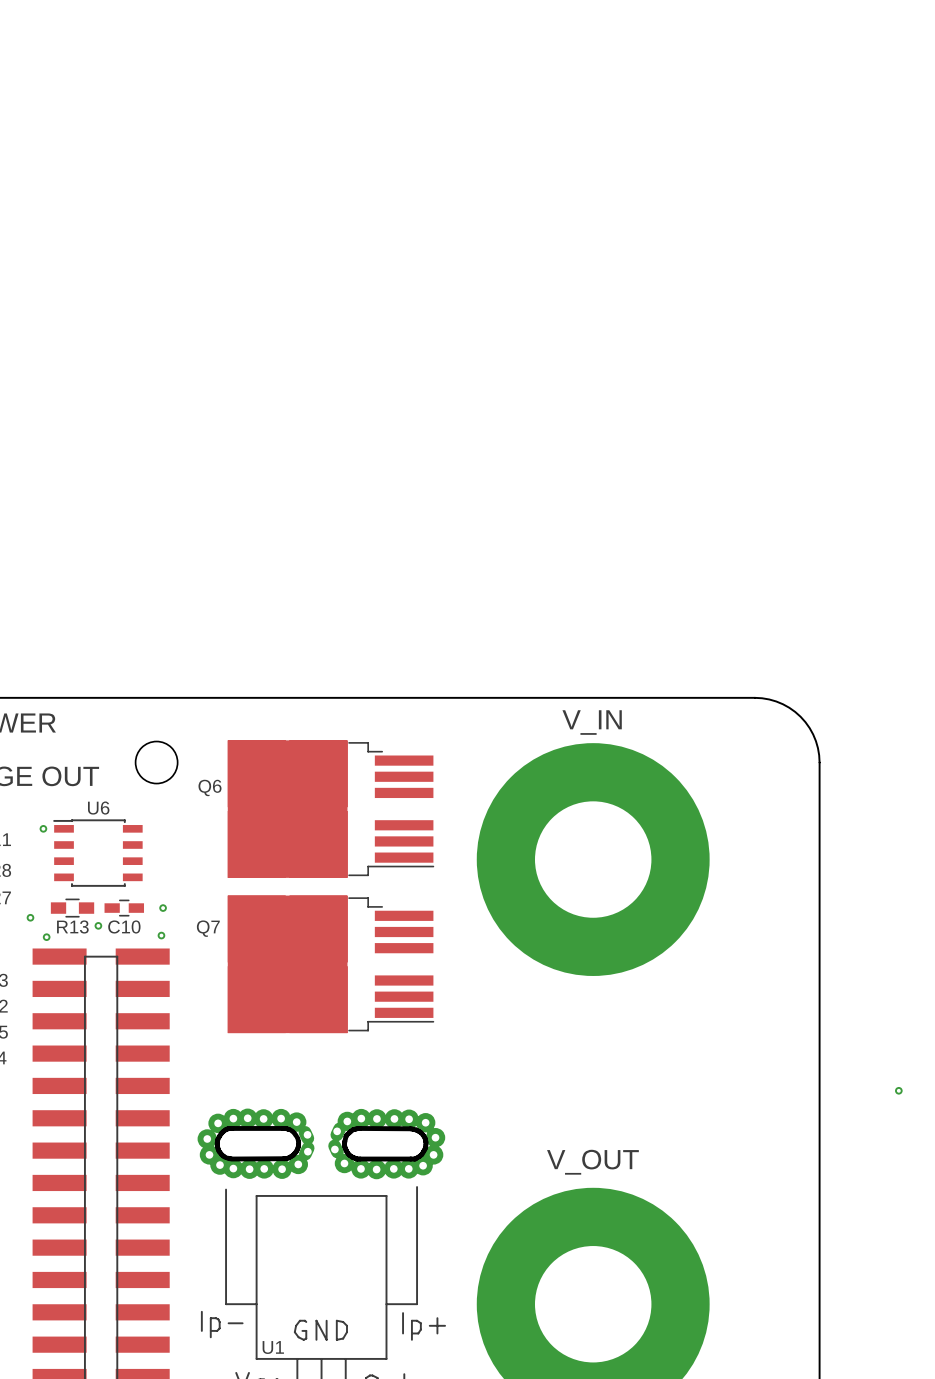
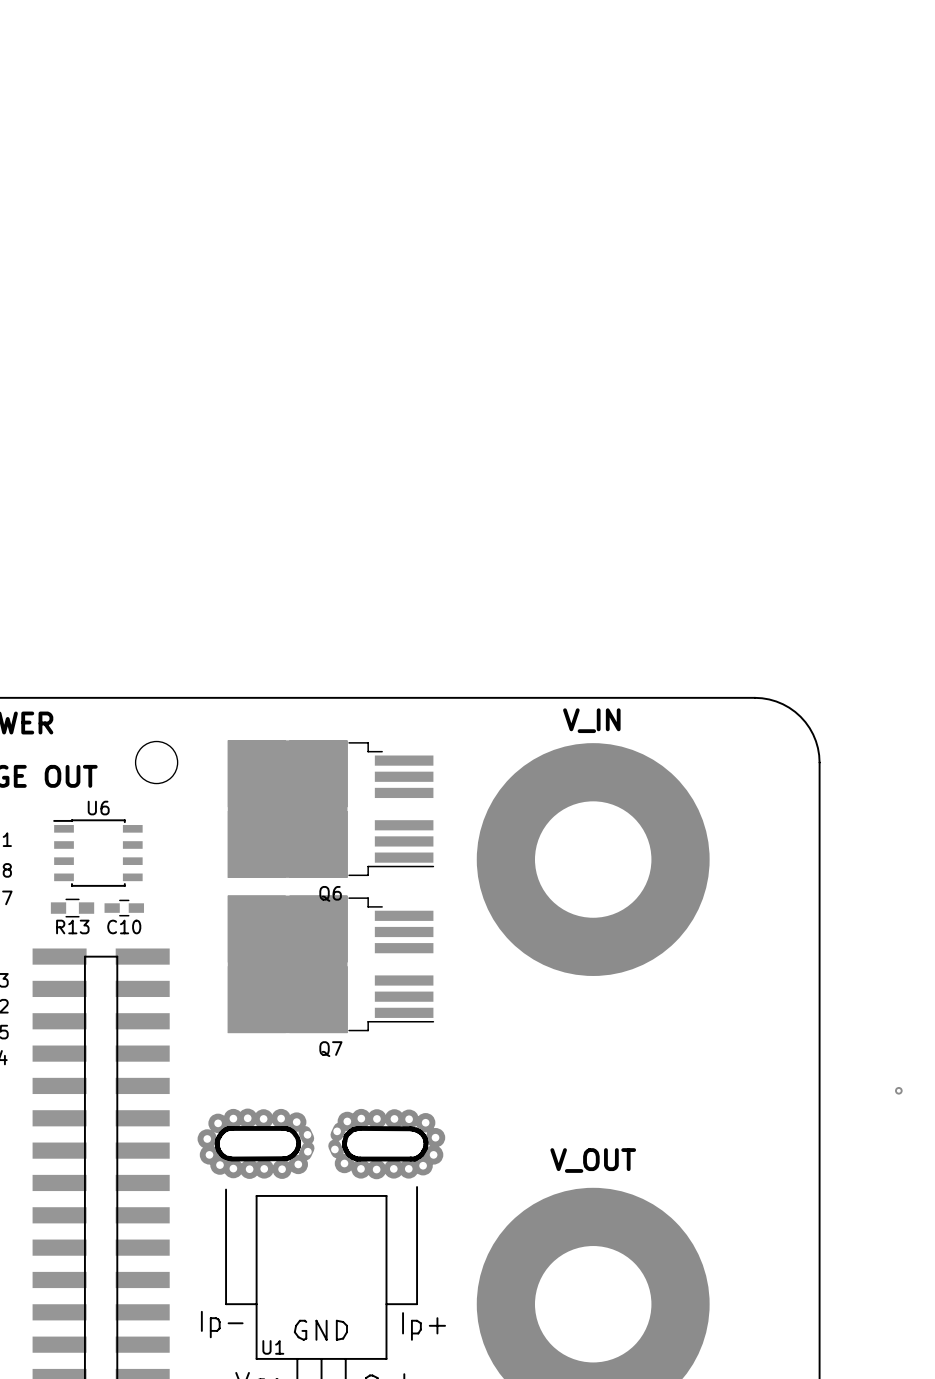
Q6 name position: Q6 (210, 787) -> Q6 (330, 893)
part: (43, 828) -> none
part: (163, 908) -> none
part: (30, 917) -> none
part: (98, 925) -> none
Q7 name position: Q7 (208, 928) -> Q7 (330, 1049)
part: (161, 935) -> none
part: (46, 937) -> none

